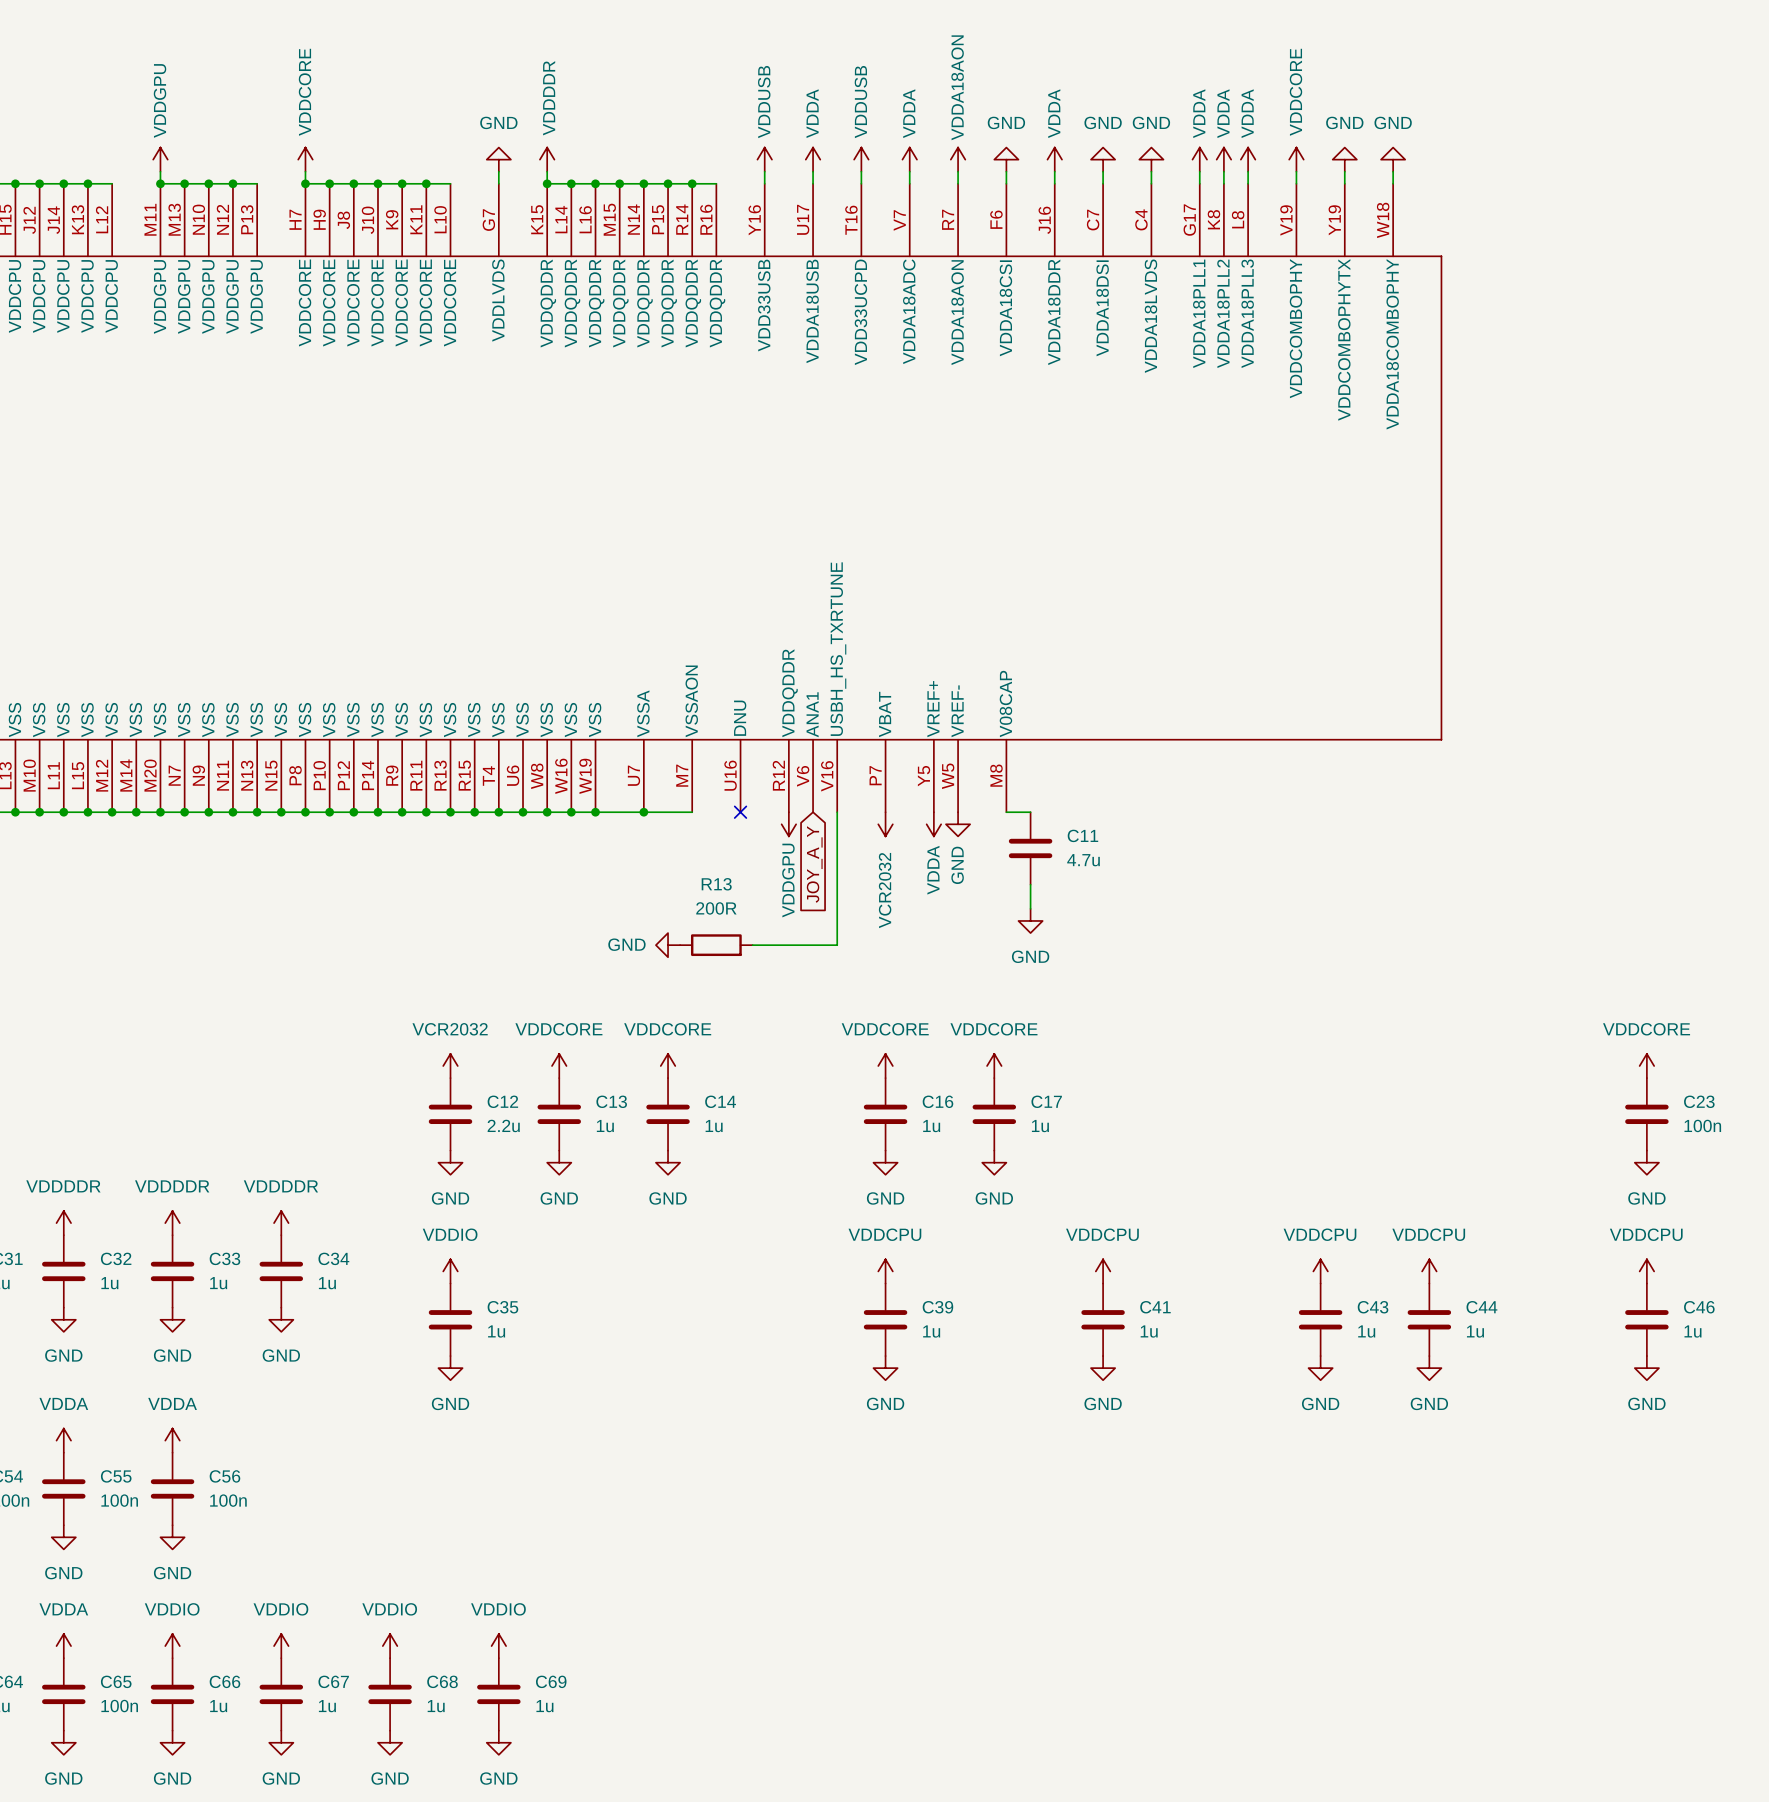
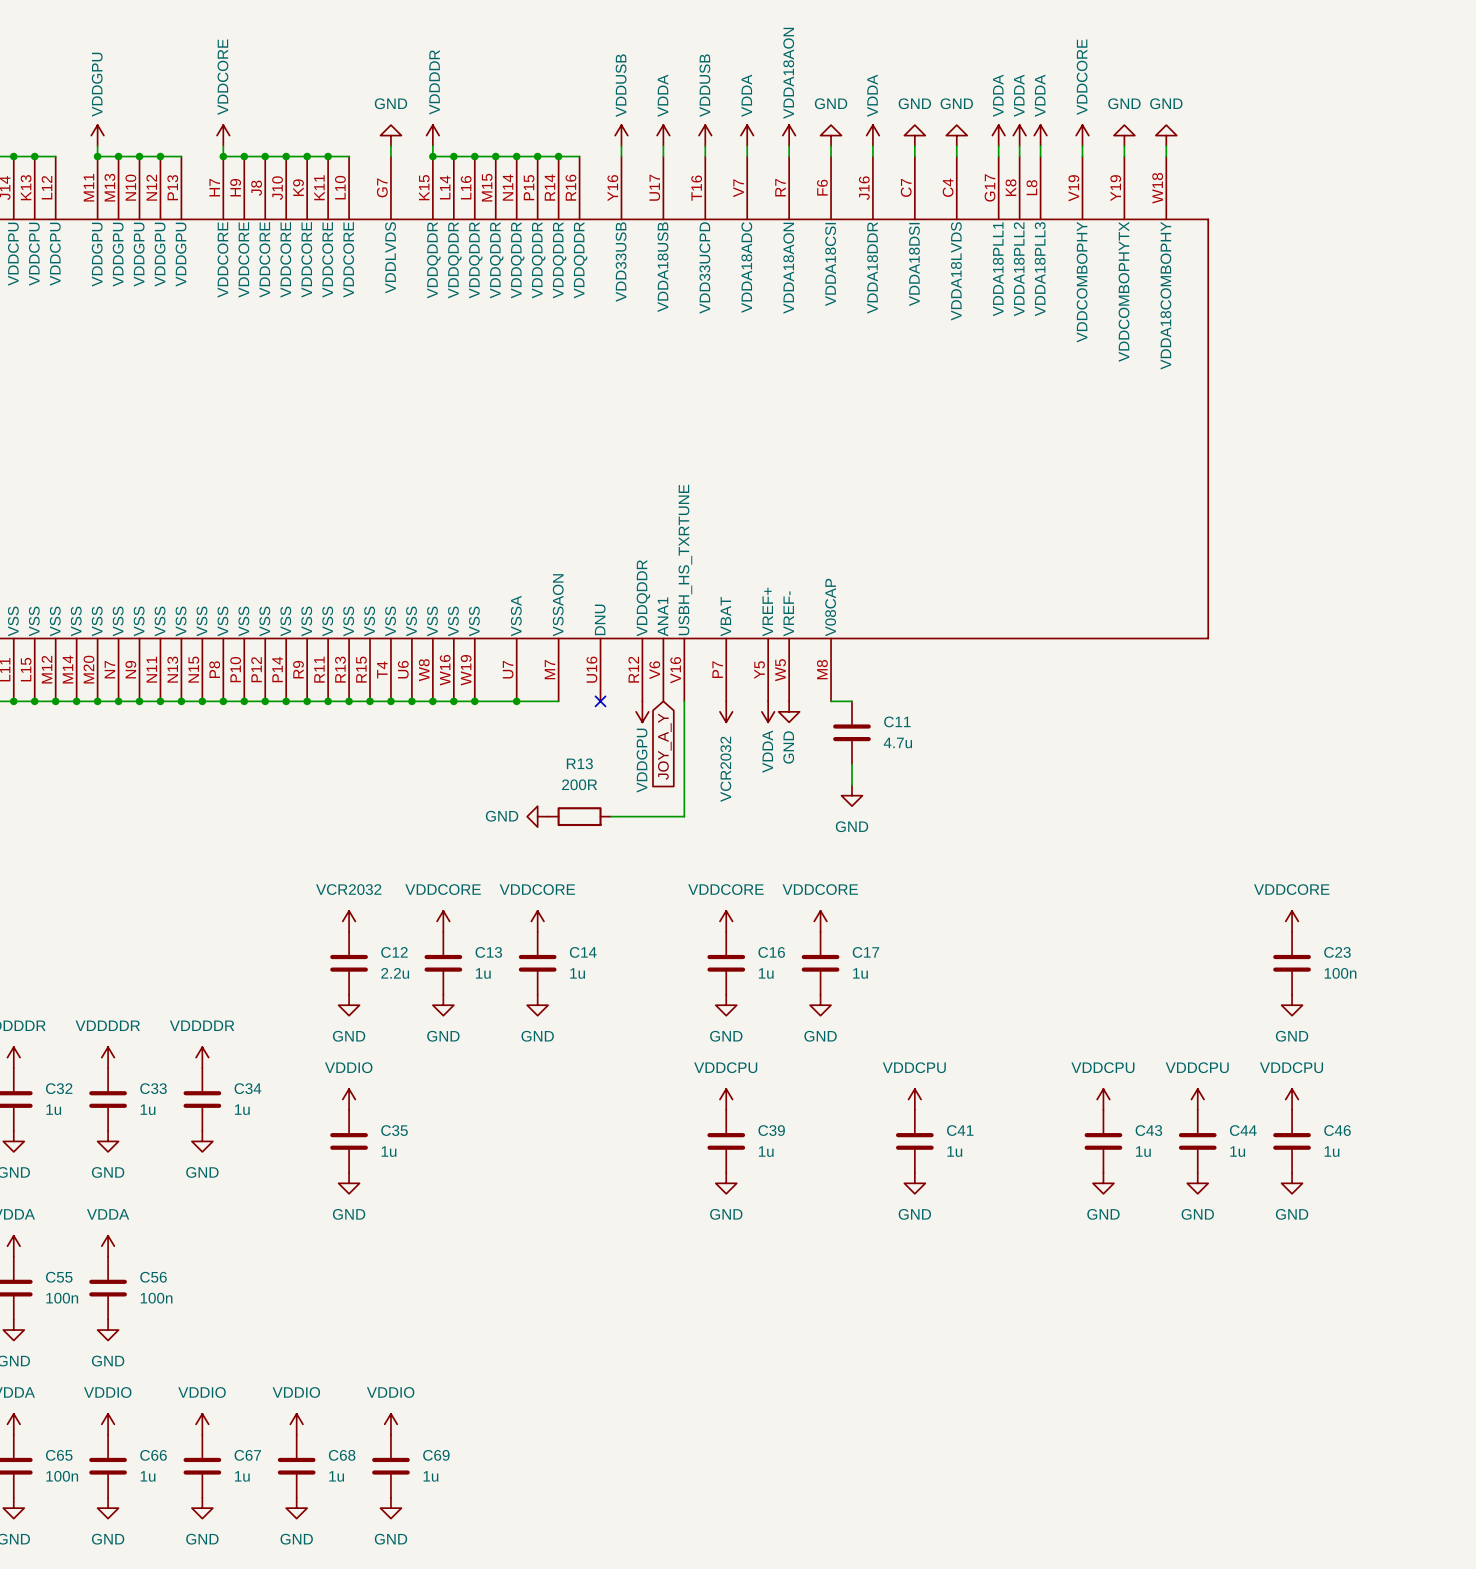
power symbol position: VDDCORE (1646, 1066) -> VDDCORE (1292, 921)
C23 position: (1646, 1114) -> (1292, 963)
power symbol position: GND (1646, 1162) -> GND (1292, 1005)
power symbol position: VDDCPU (1646, 1271) -> VDDCPU (1292, 1099)
C46 position: (1646, 1319) -> (1292, 1141)
power symbol position: GND (1646, 1368) -> GND (1292, 1183)

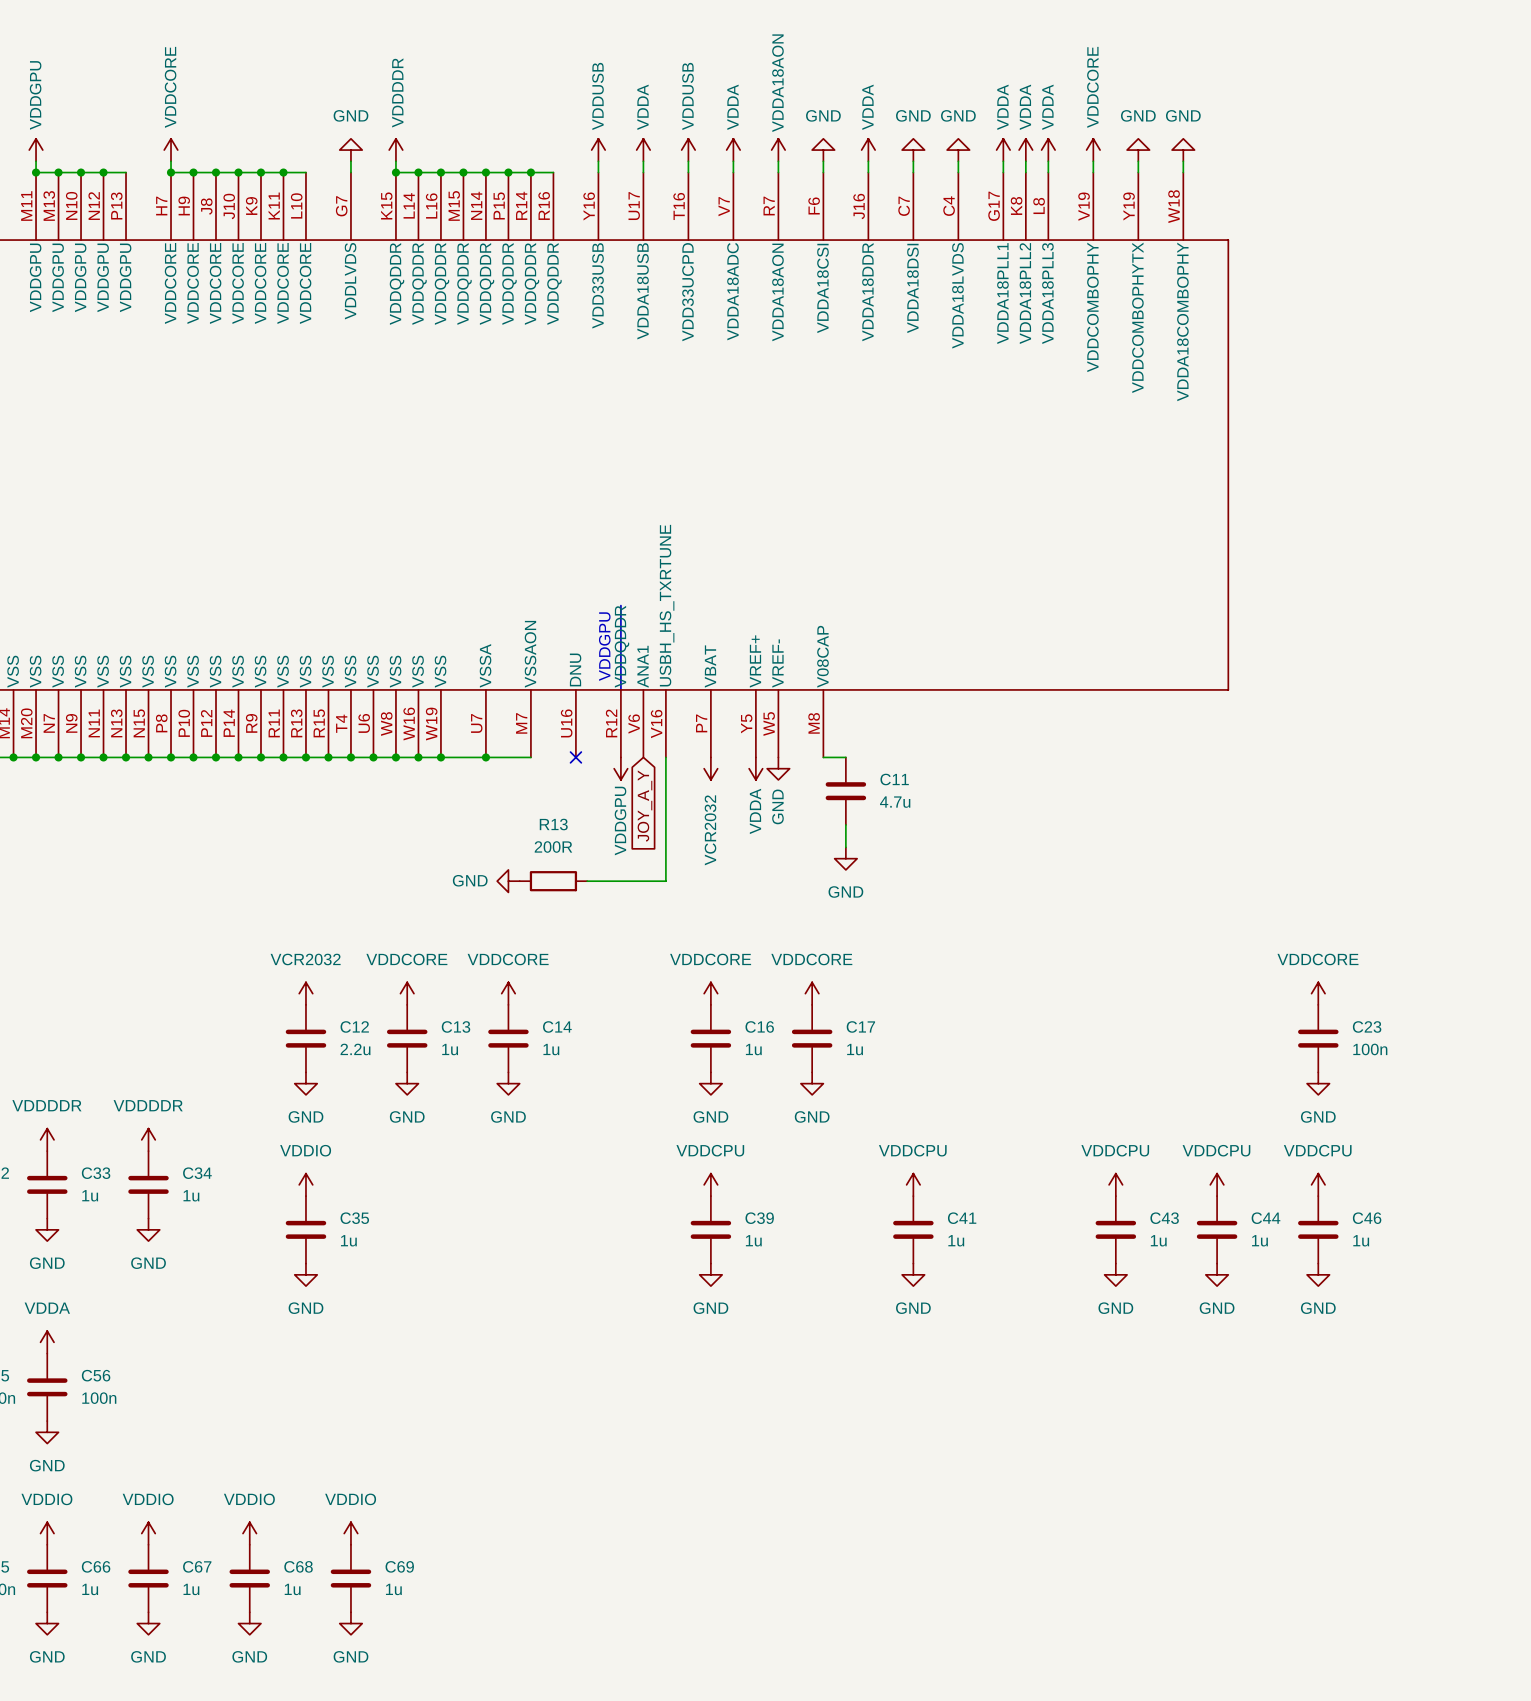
line: none -> (620, 605) (620, 689)
text: none -> VDDGPU (604, 646)

